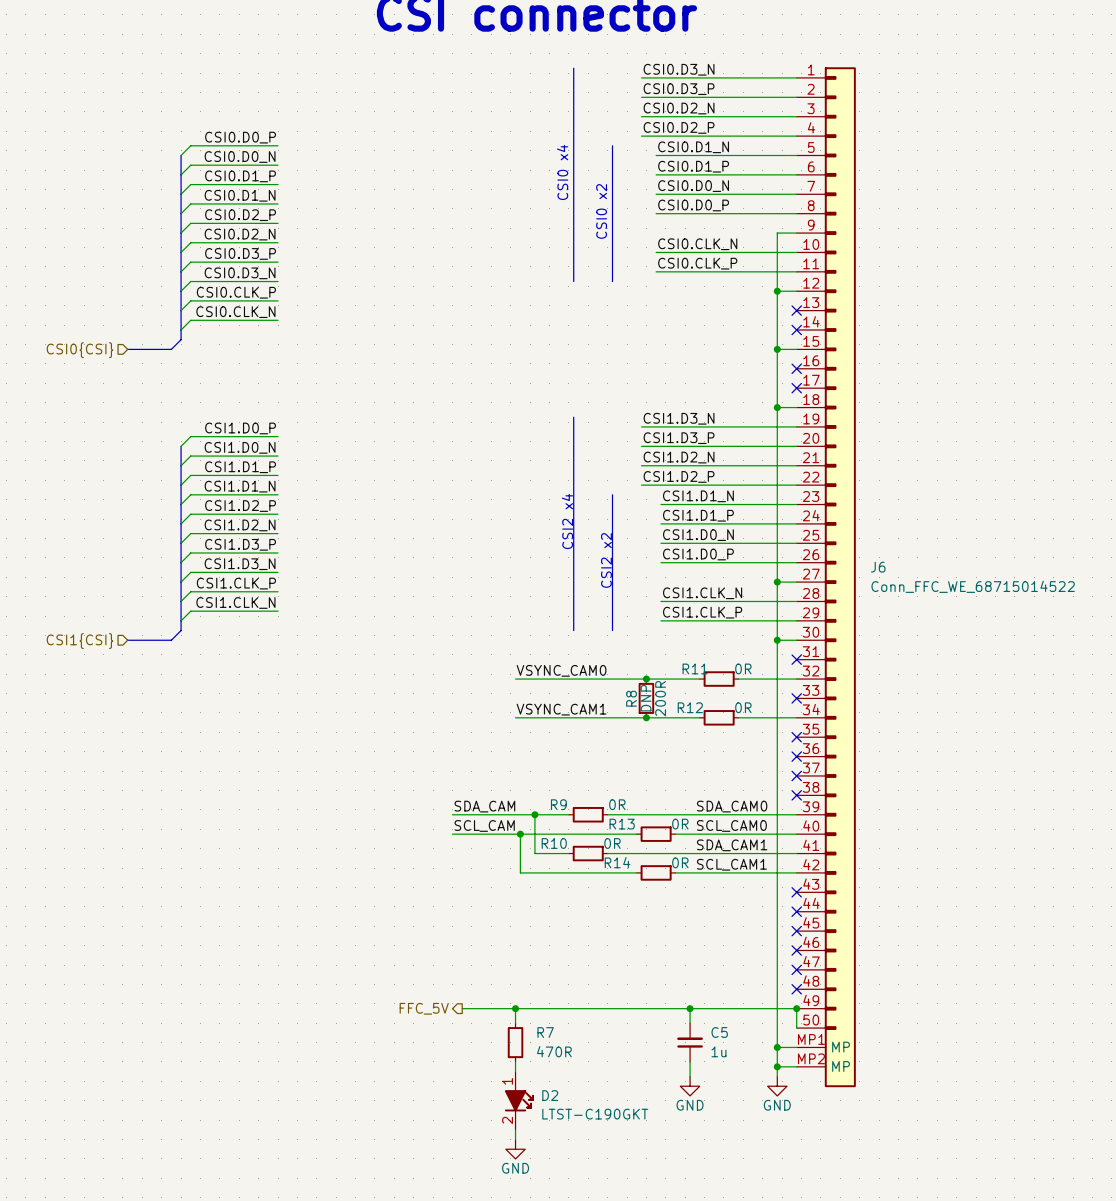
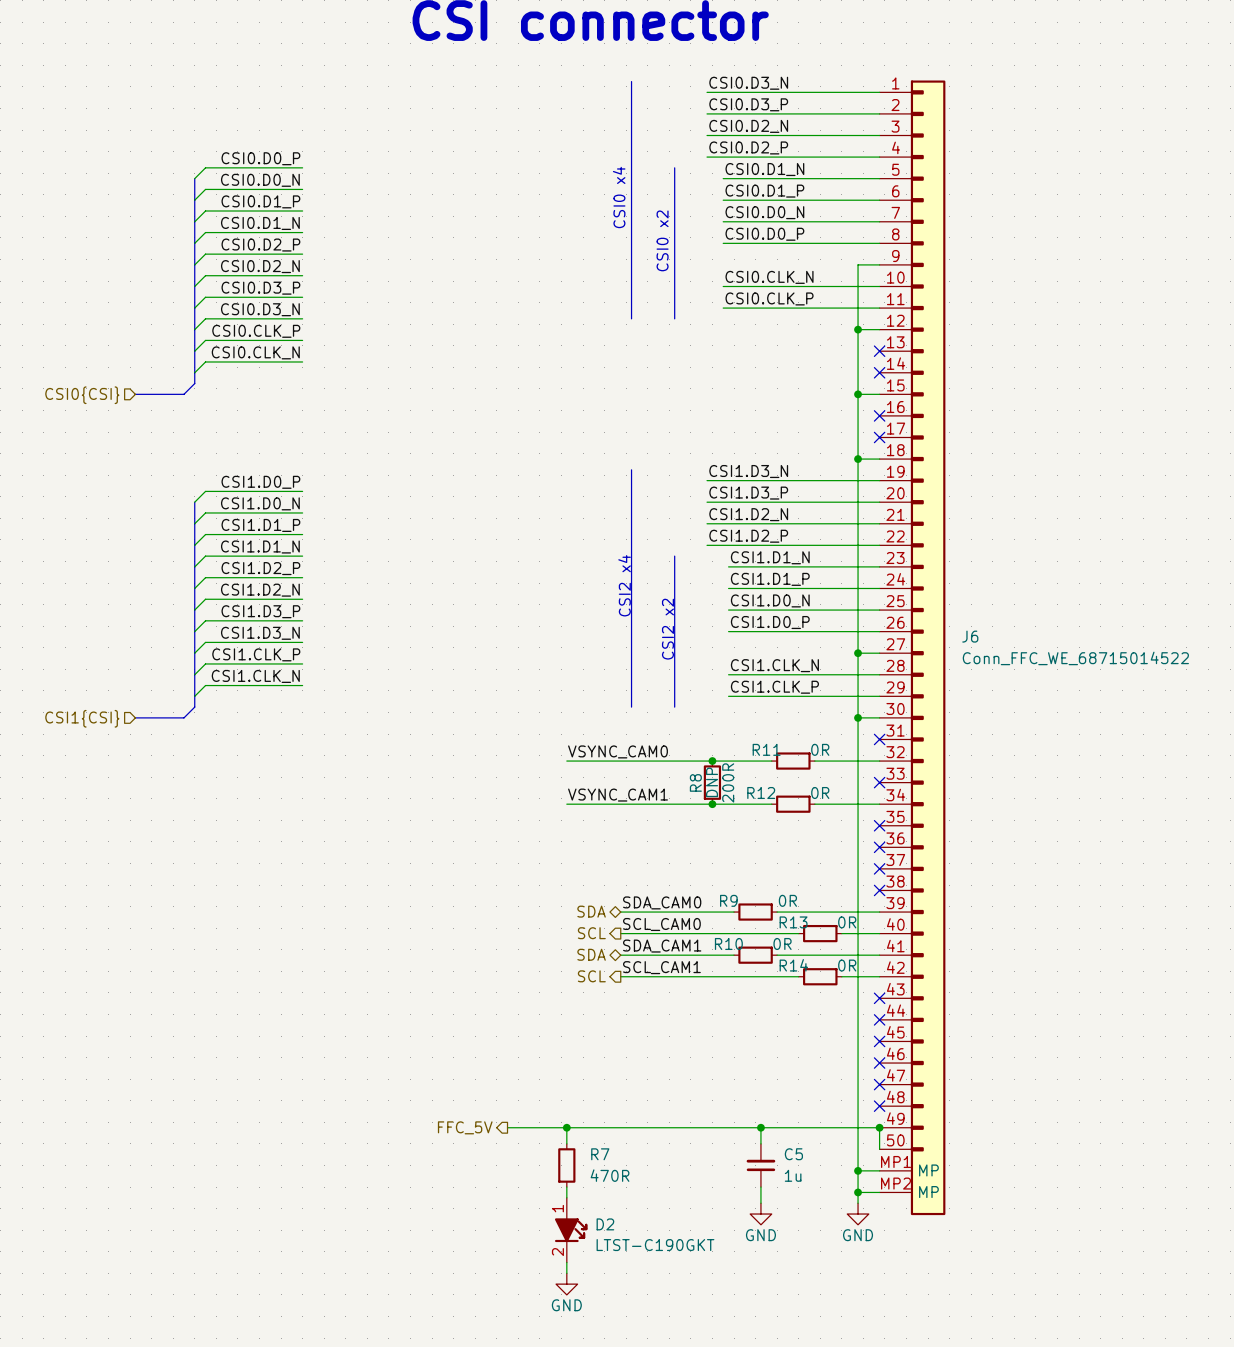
R9 name position: R9 (558, 804) -> R9 (728, 900)
label: SDA_CAM (484, 806) -> none
label position: SDA_CAM0 (732, 806) -> SDA_CAM0 (662, 902)
wire: (452, 814) (564, 814) -> none
wire: (534, 814) (534, 853) (564, 853) -> none
junction: (534, 814) -> none
hierarchical label: none -> SDA (591, 911)
R9 position: (588, 814) -> (755, 912)
wire: (665, 814) (704, 814) -> (701, 933) (744, 933)
R13 name position: R13 (622, 824) -> R13 (793, 922)
label: SCL_CAM (484, 825) -> none
label position: SCL_CAM0 (731, 825) -> SCL_CAM0 (661, 924)
hierarchical label: none -> SCL (591, 933)
wire: (452, 834) (564, 834) -> none
wire: (520, 834) (520, 872) (564, 872) -> none
junction: (520, 834) -> none
R13 position: (656, 834) -> (820, 933)
wire: (723, 834) (762, 834) -> (626, 912) (669, 912)
R10 name position: R10 (554, 843) -> R10 (728, 943)
label position: SDA_CAM1 (732, 845) -> SDA_CAM1 (662, 946)
hierarchical label: none -> SDA (591, 954)
R10 position: (588, 853) -> (755, 955)
wire: (665, 853) (704, 853) -> (701, 976) (744, 976)
R14 name position: R14 (617, 862) -> R14 (793, 965)
label position: SCL_CAM1 (731, 864) -> SCL_CAM1 (661, 967)
hierarchical label: none -> SCL (591, 976)
R14 position: (656, 872) -> (820, 976)
wire: (723, 872) (762, 872) -> (626, 955) (669, 955)

